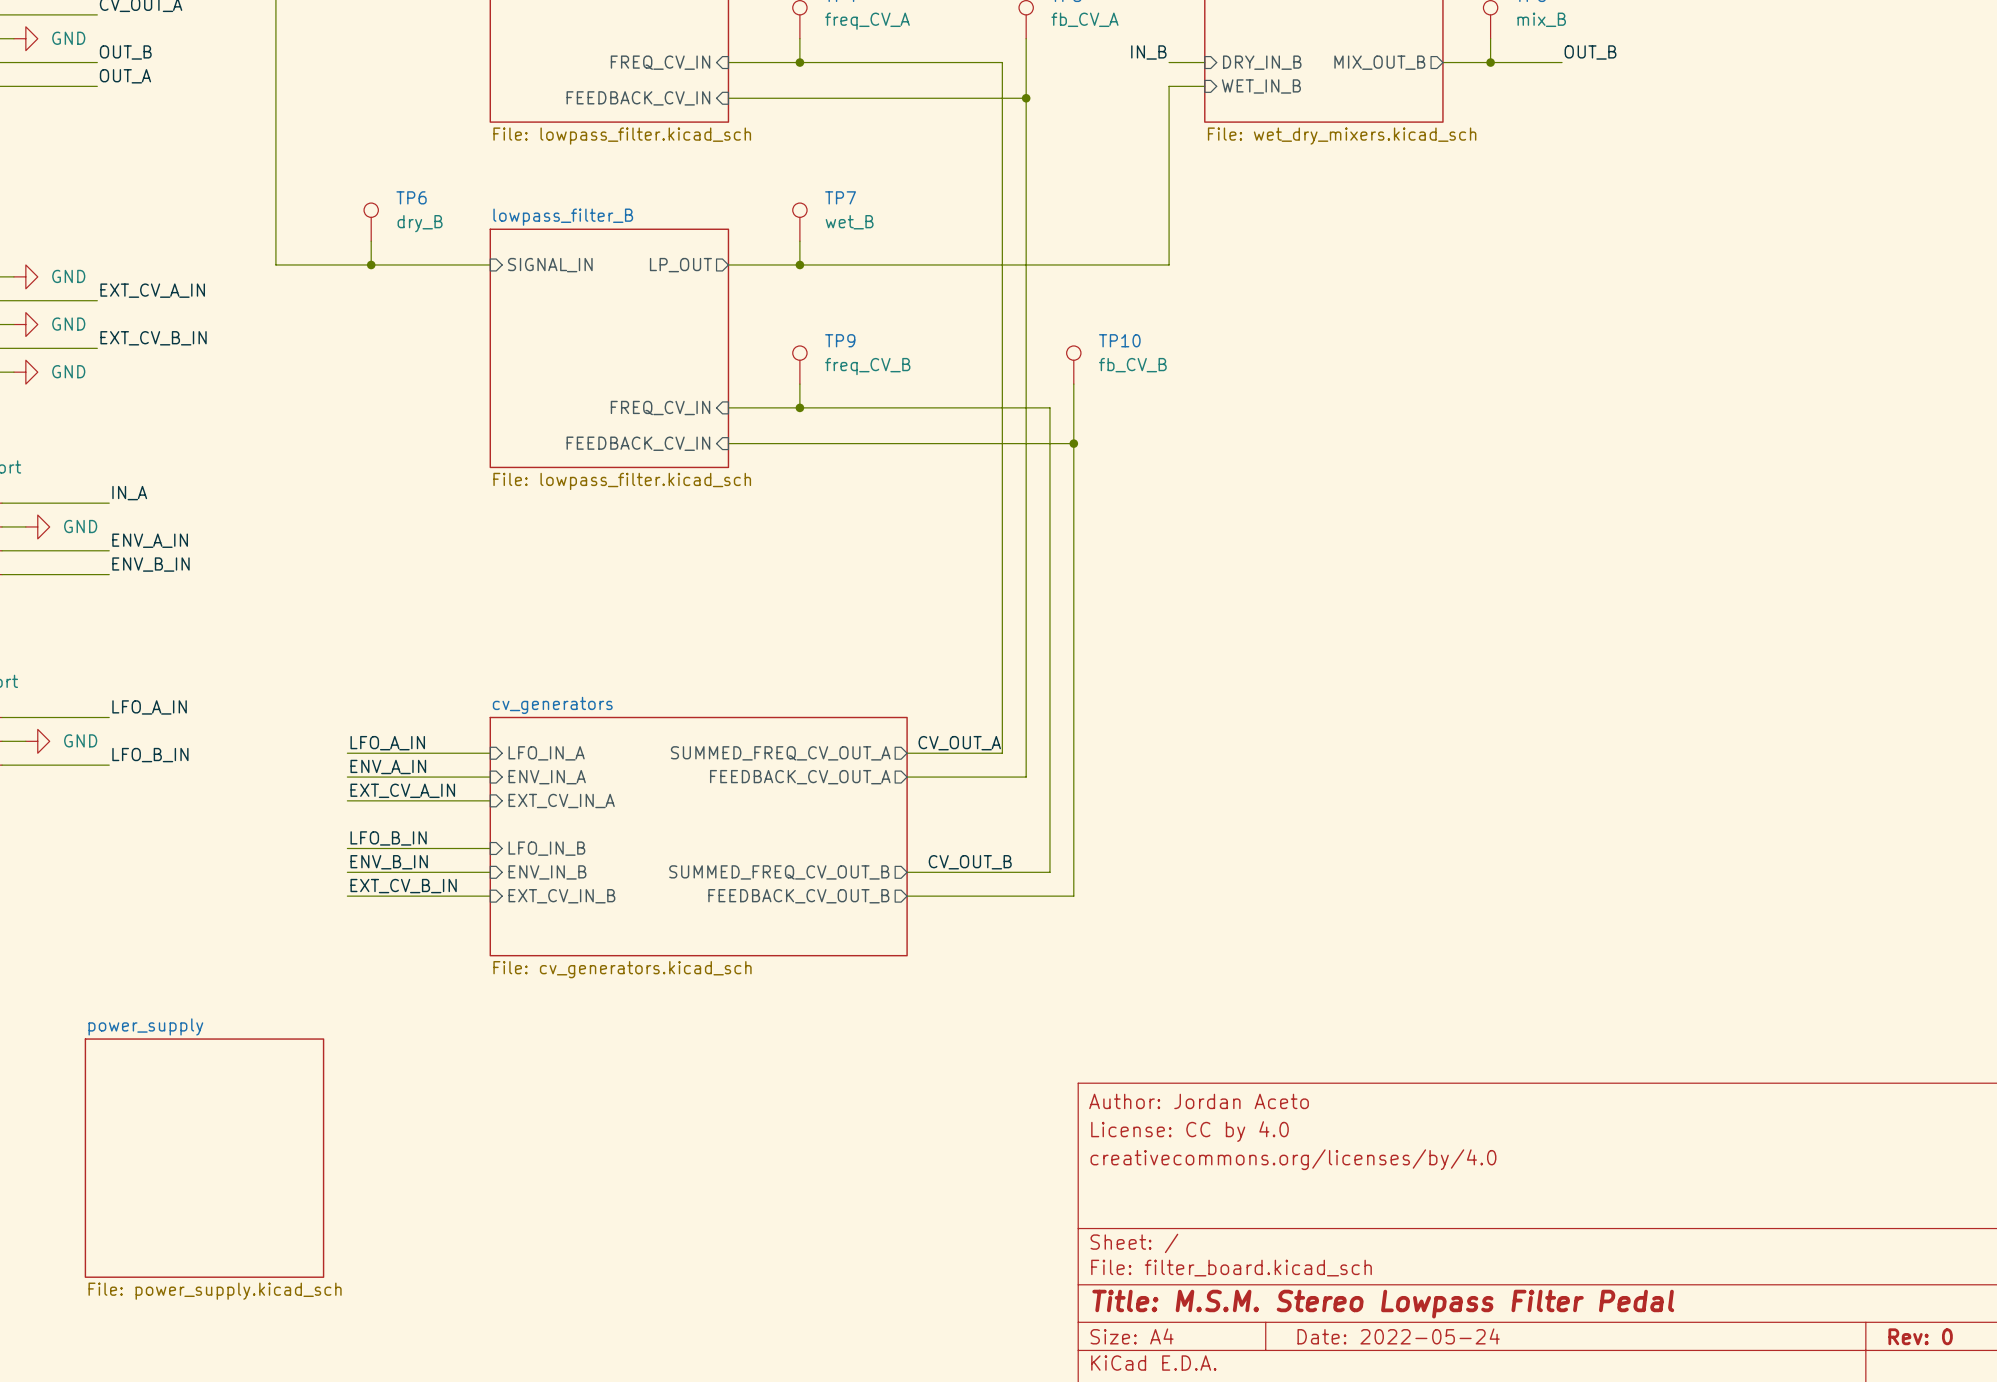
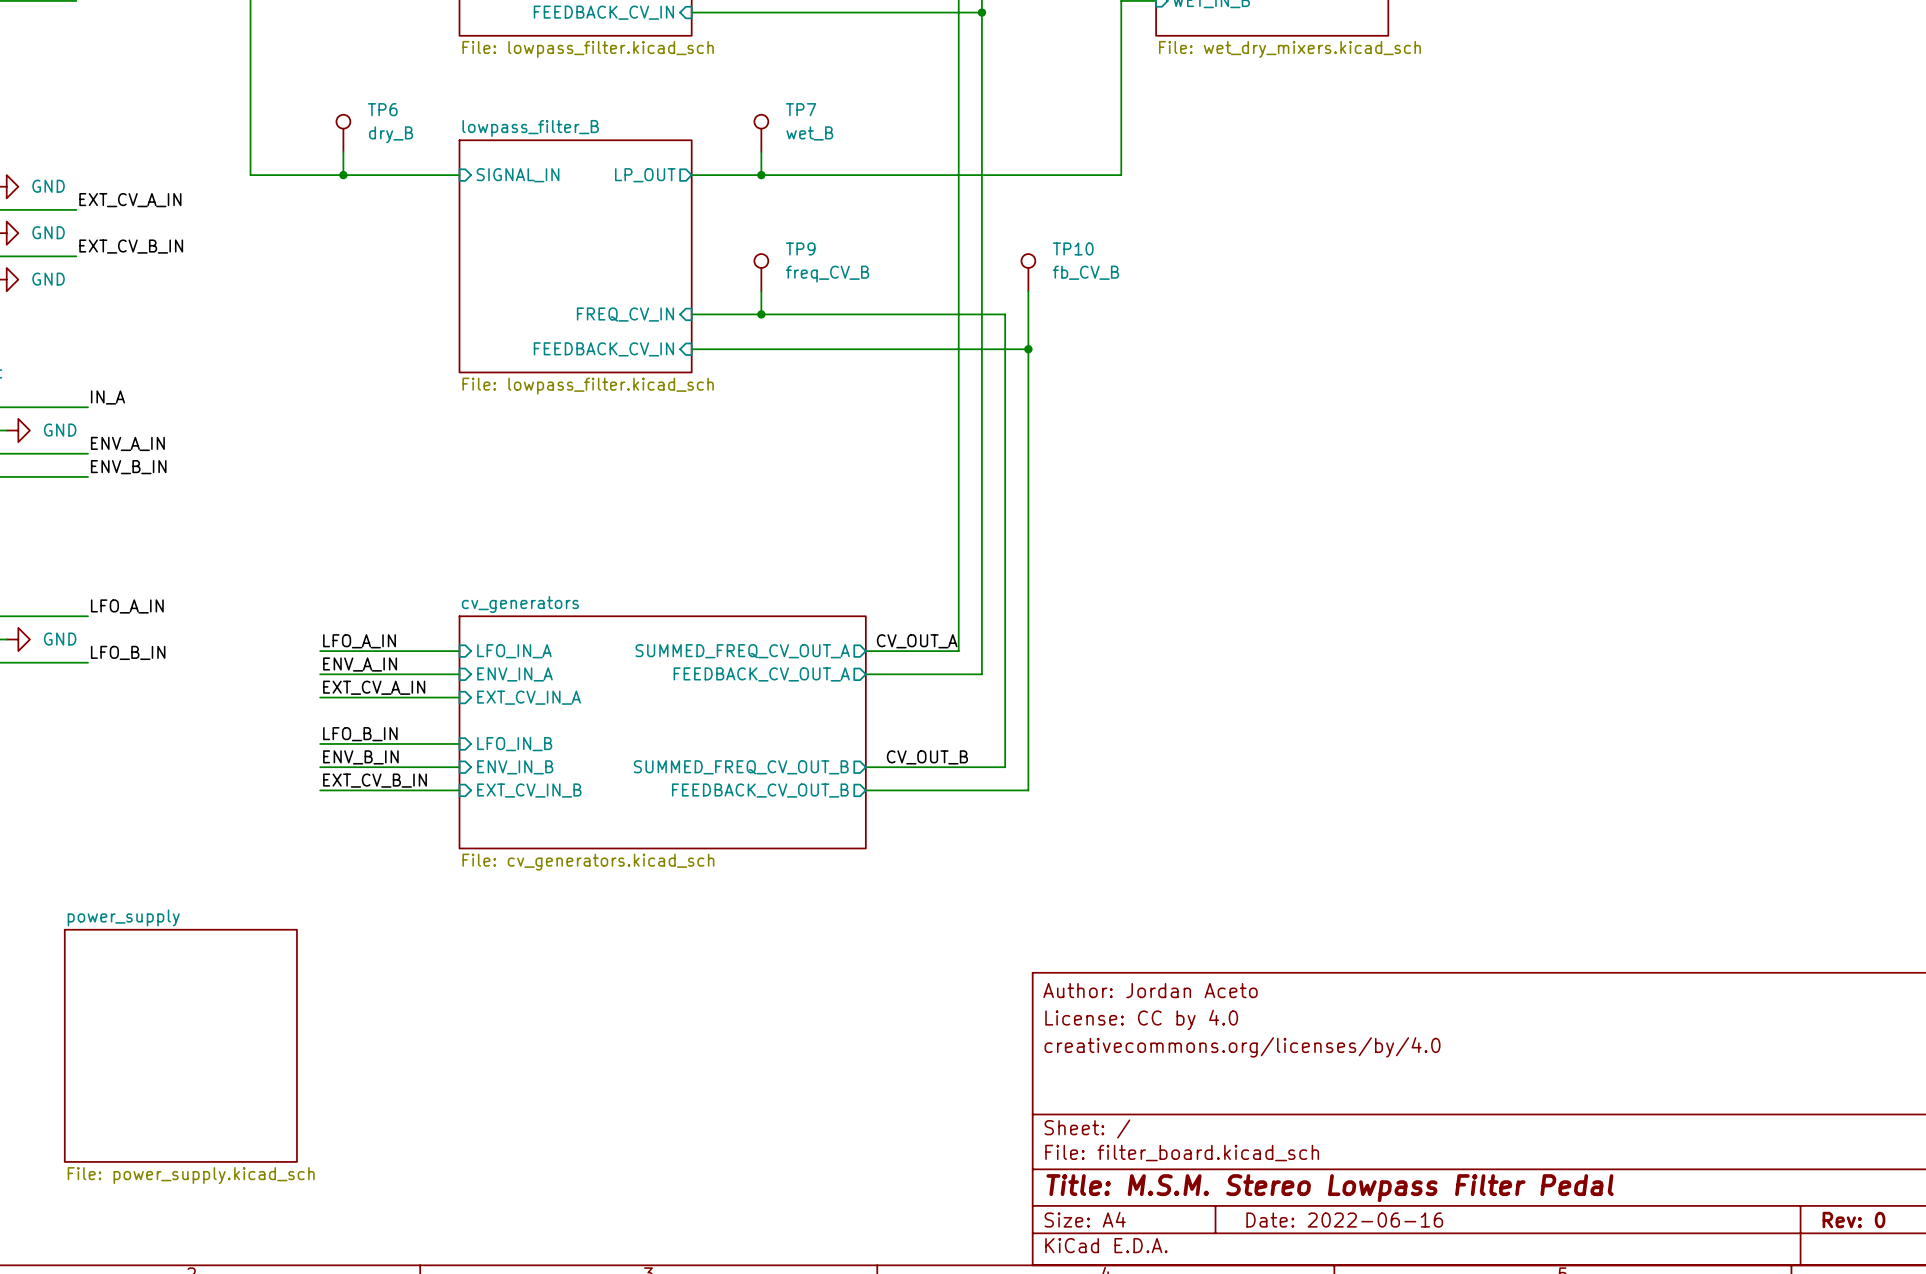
title block: Date: 2022-05-24 (1398, 1336) -> Date: 2022-06-16 (1344, 1220)

